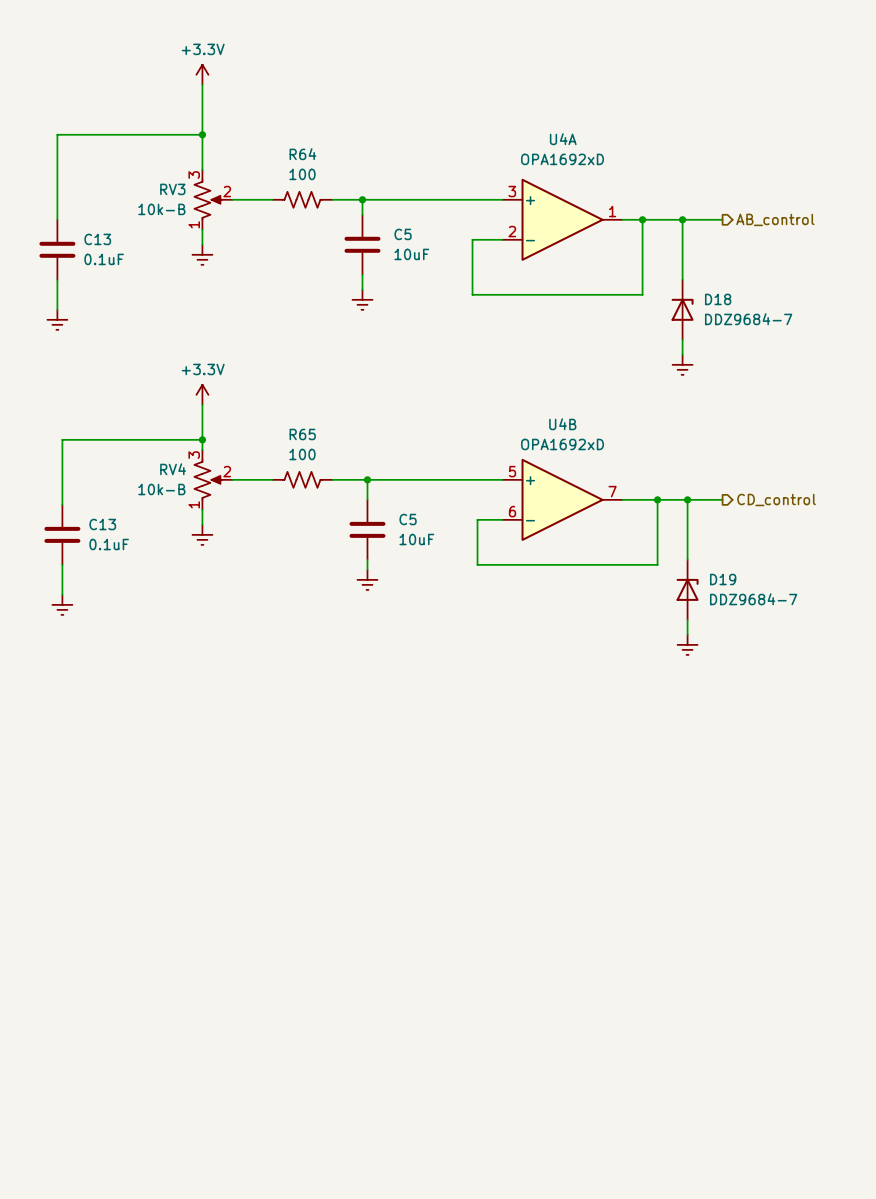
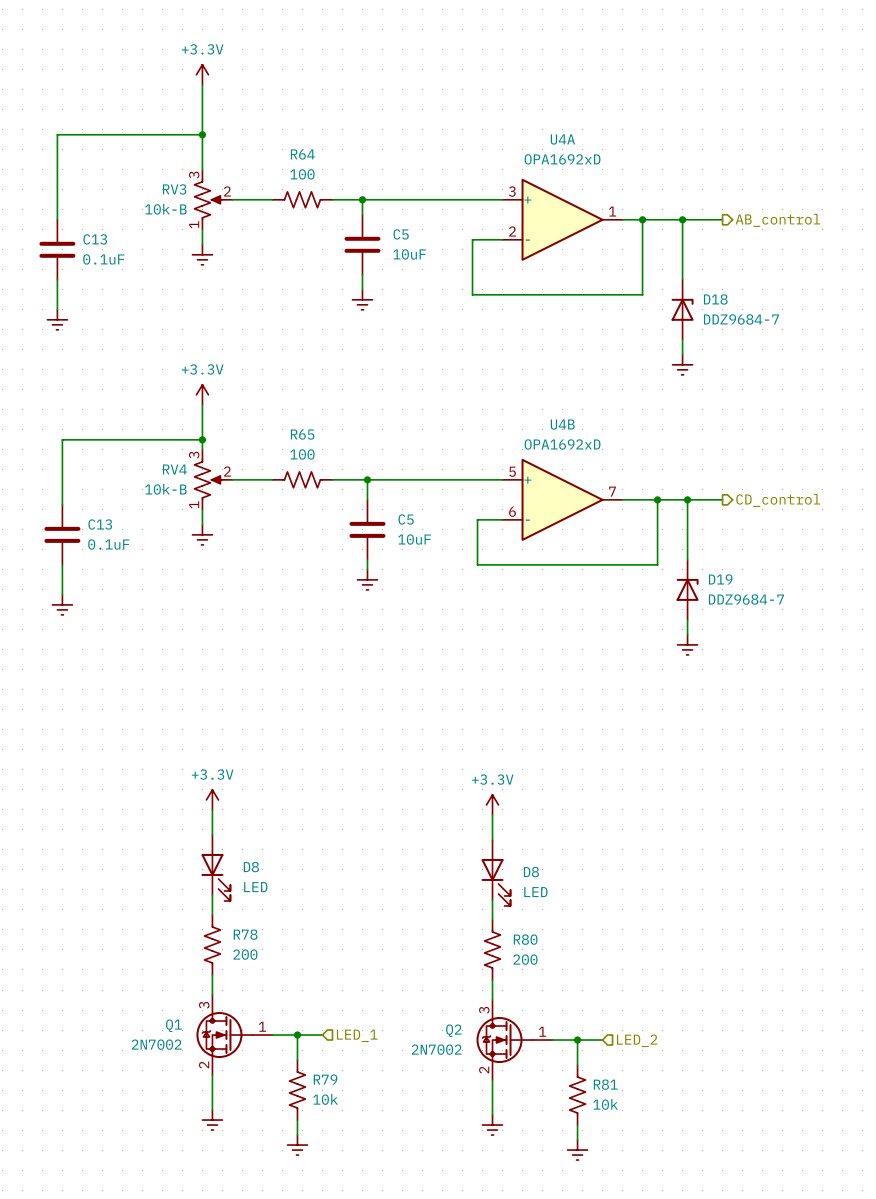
power symbol: none -> +3.3V (212, 799)
power symbol: none -> +3.3V (492, 804)
wire: none -> (212, 809) (212, 834)
wire: none -> (492, 814) (492, 839)
D8: none -> LED (215, 867)
D8: none -> LED (496, 872)
wire: none -> (212, 894) (212, 914)
wire: none -> (492, 899) (492, 919)
R78: none -> 200 (212, 944)
R80: none -> 200 (492, 949)
wire: none -> (212, 974) (212, 995)
wire: none -> (492, 979) (492, 1000)
Q1: none -> 2N7002 (234, 1035)
wire: none -> (272, 1035) (322, 1035)
wire: none -> (297, 1035) (297, 1060)
junction: none -> (297, 1035)
hierarchical label: none -> LED_1 (357, 1035)
Q2: none -> 2N7002 (514, 1040)
wire: none -> (552, 1040) (602, 1040)
wire: none -> (577, 1040) (577, 1065)
junction: none -> (577, 1040)
hierarchical label: none -> LED_2 (637, 1040)
wire: none -> (212, 1075) (212, 1110)
wire: none -> (492, 1080) (492, 1115)
R79: none -> 10k (297, 1090)
R81: none -> 10k (577, 1095)
power symbol: none -> (212, 1120)
wire: none -> (297, 1120) (297, 1135)
power symbol: none -> (492, 1125)
wire: none -> (577, 1125) (577, 1140)
power symbol: none -> (297, 1145)
power symbol: none -> (577, 1150)

